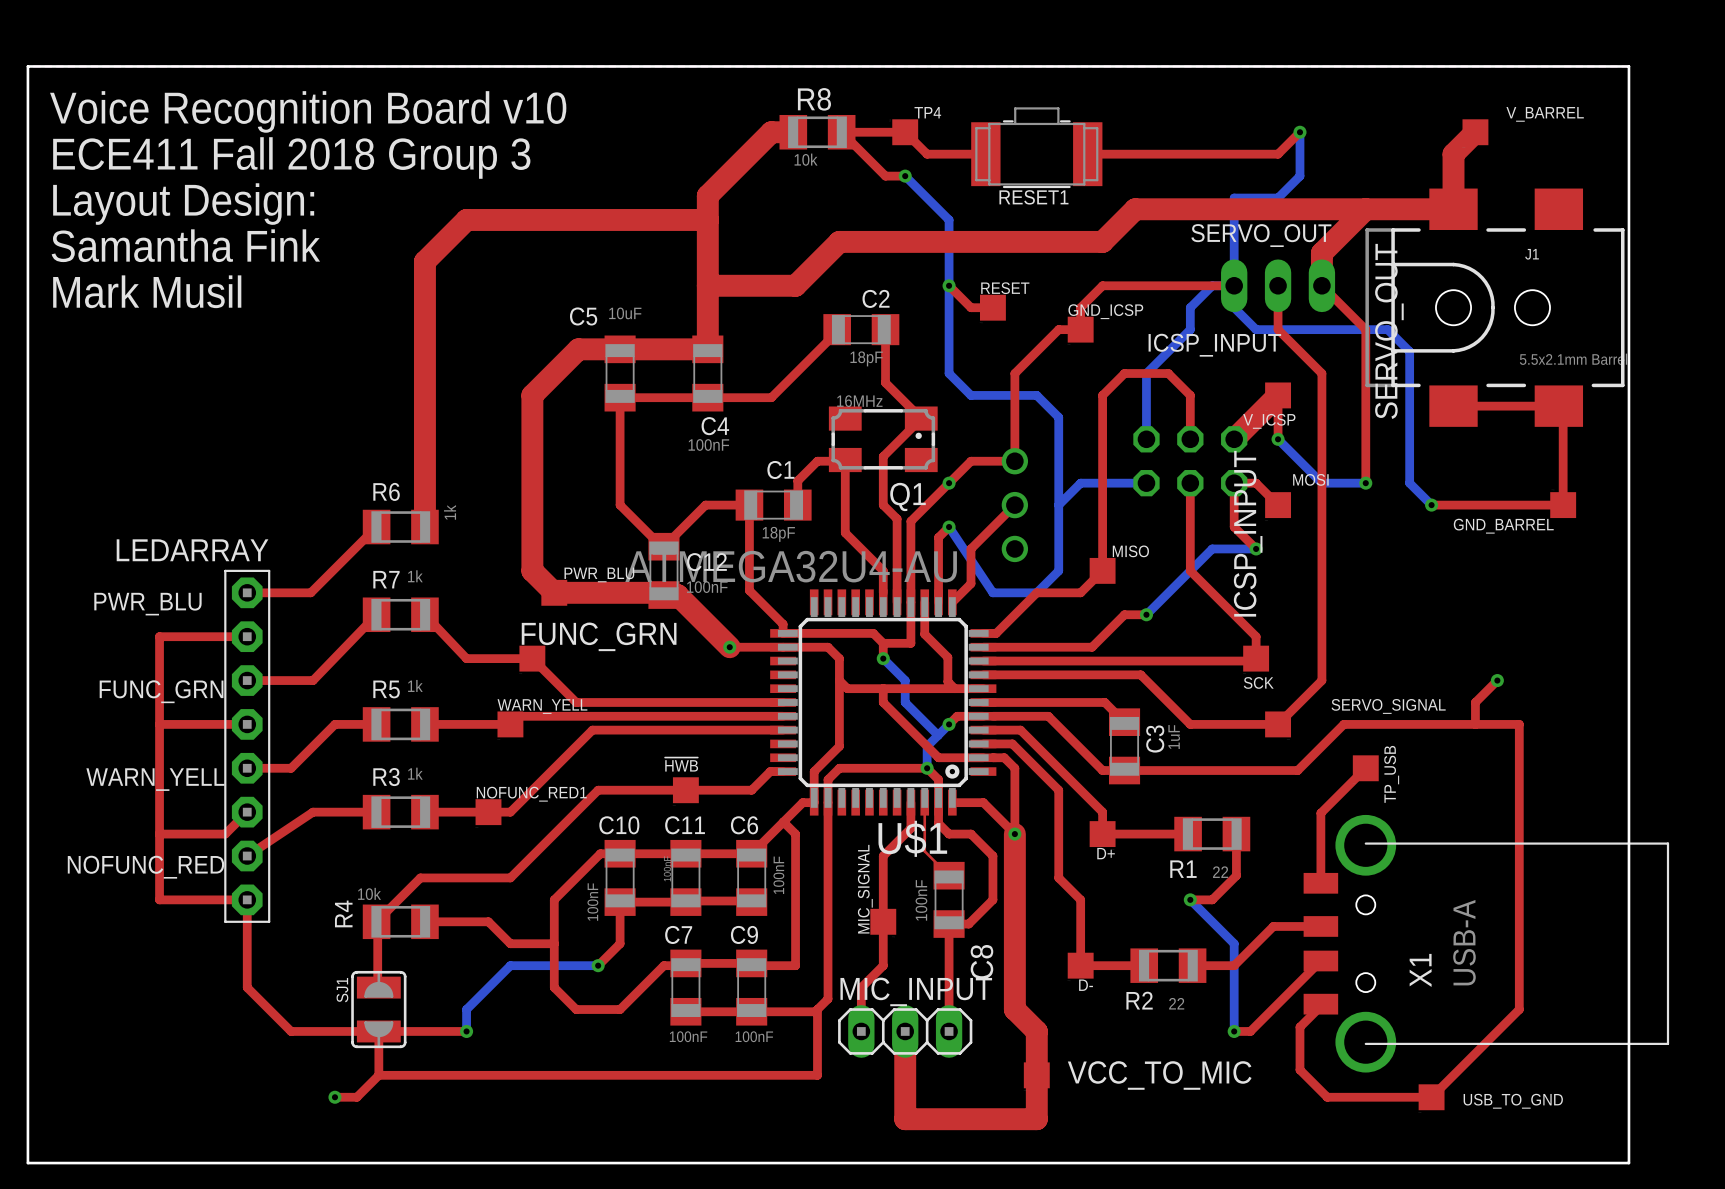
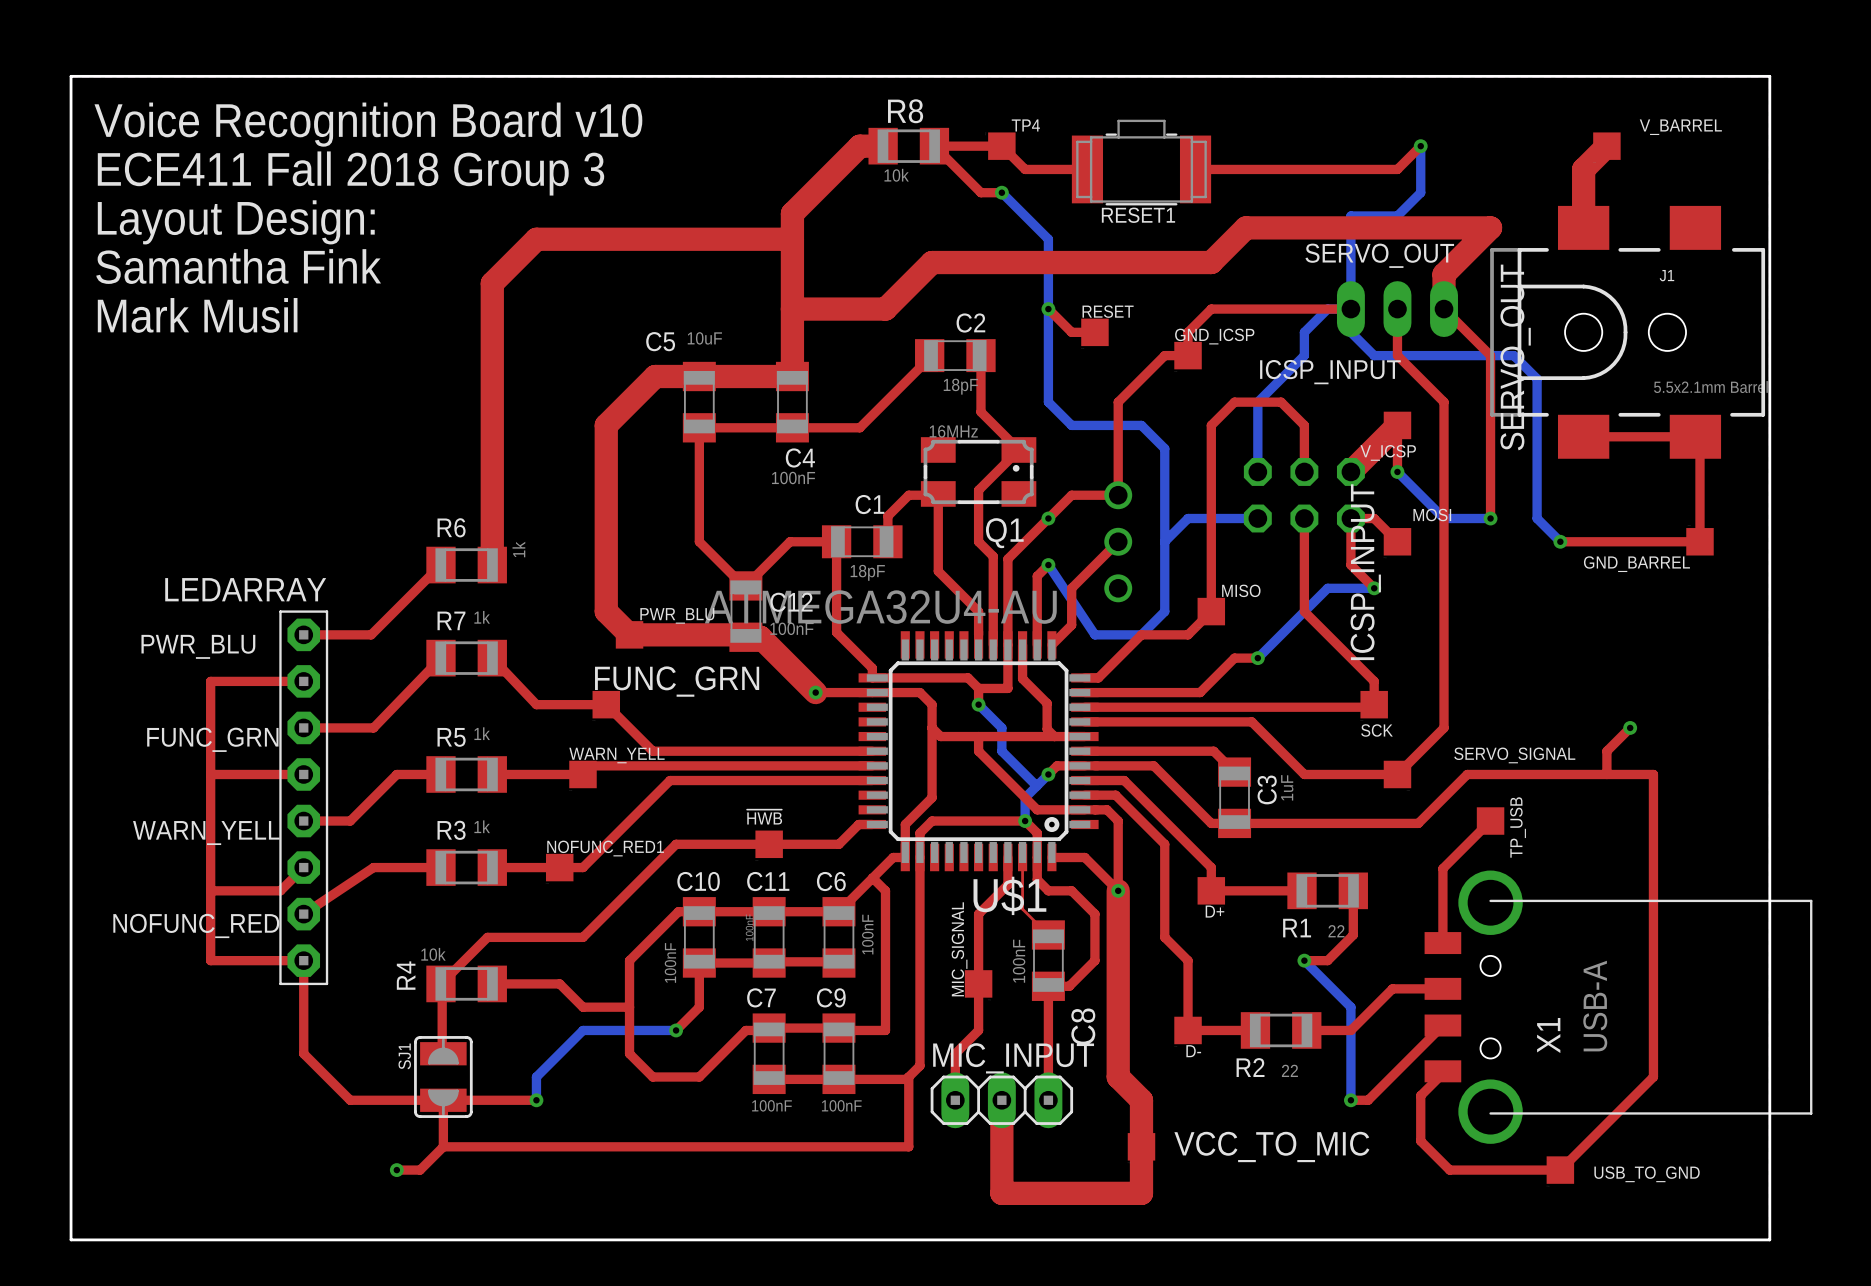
top track: (1365, 209) (1453, 209) -> none

